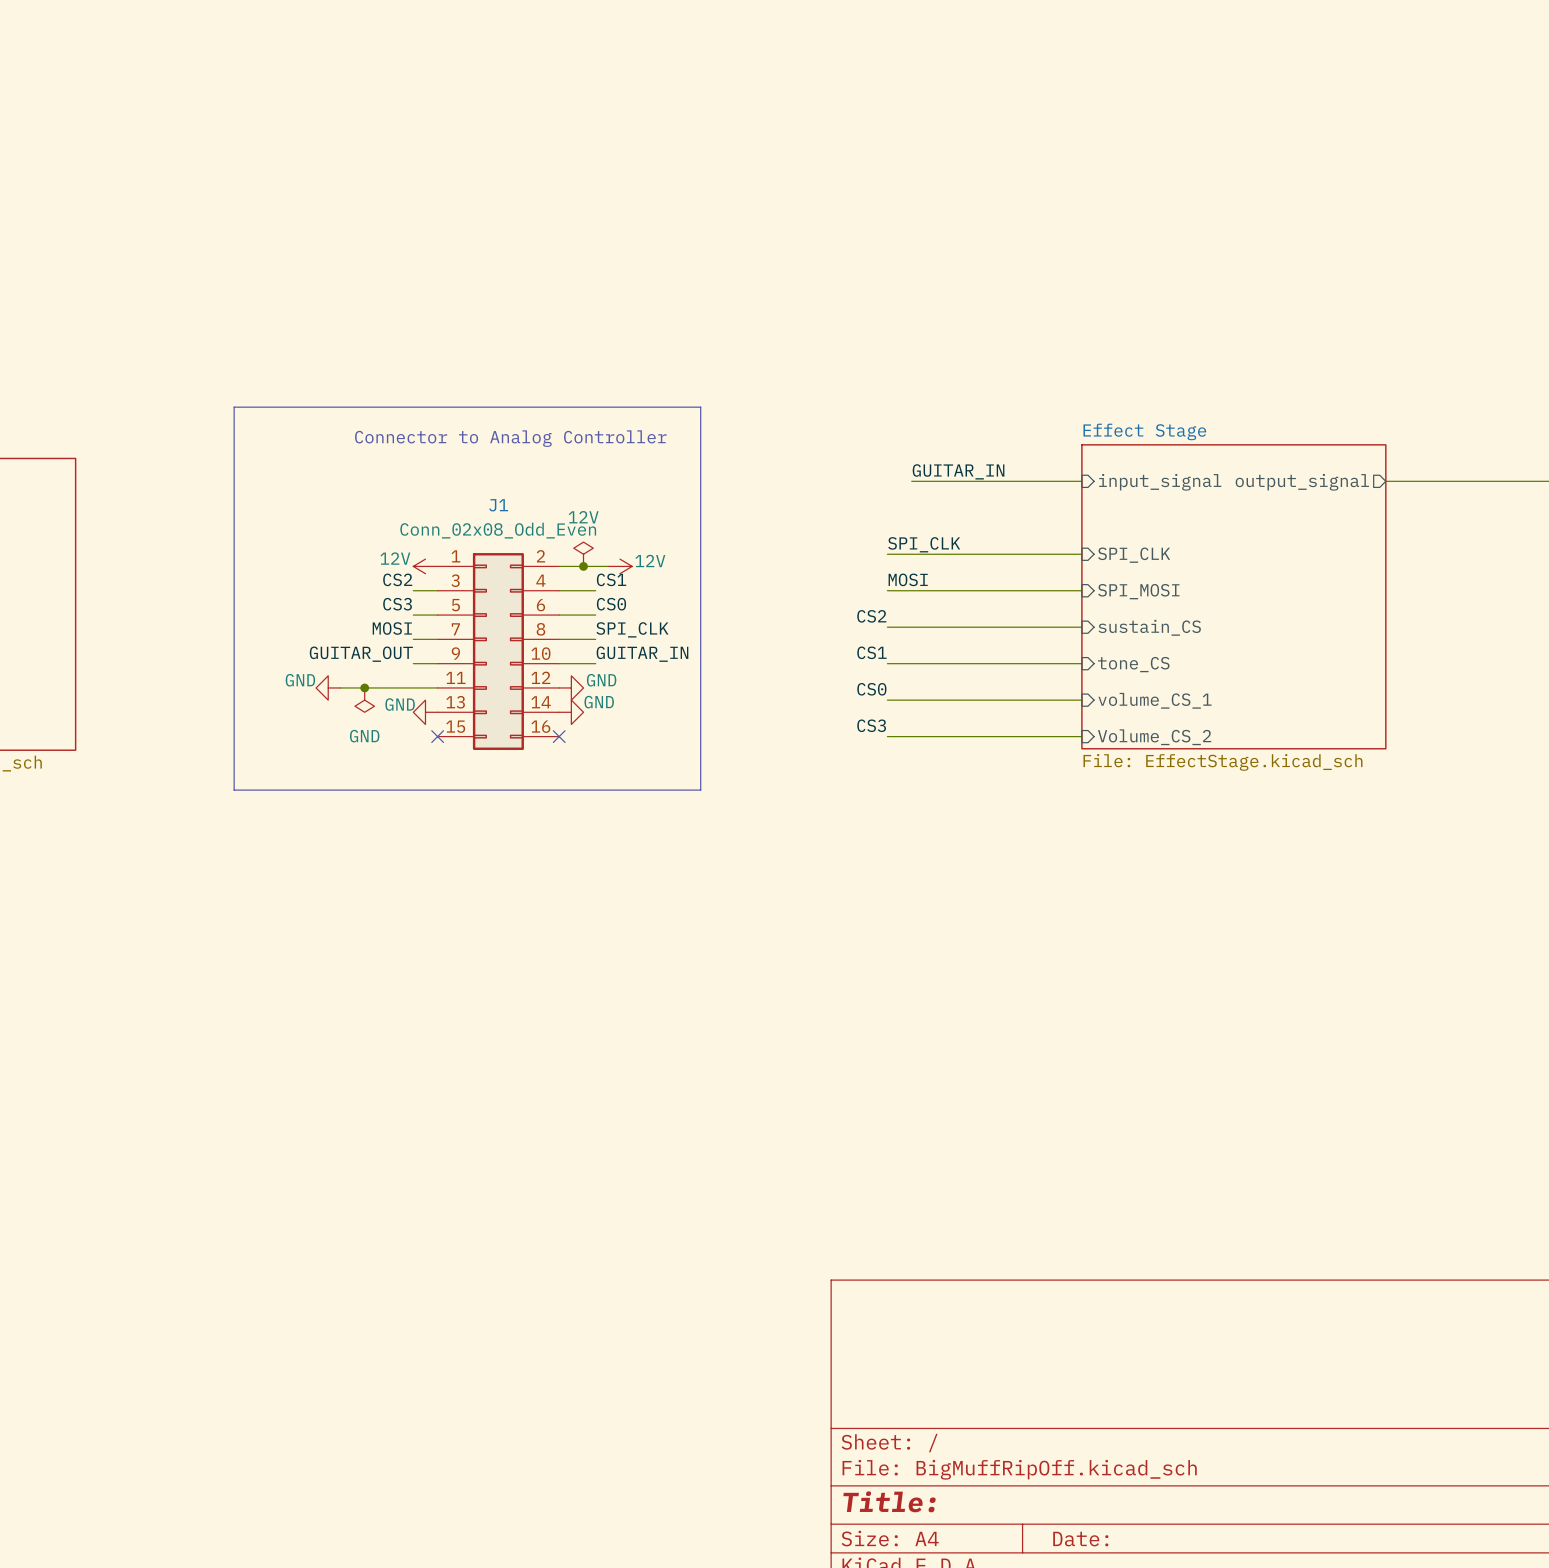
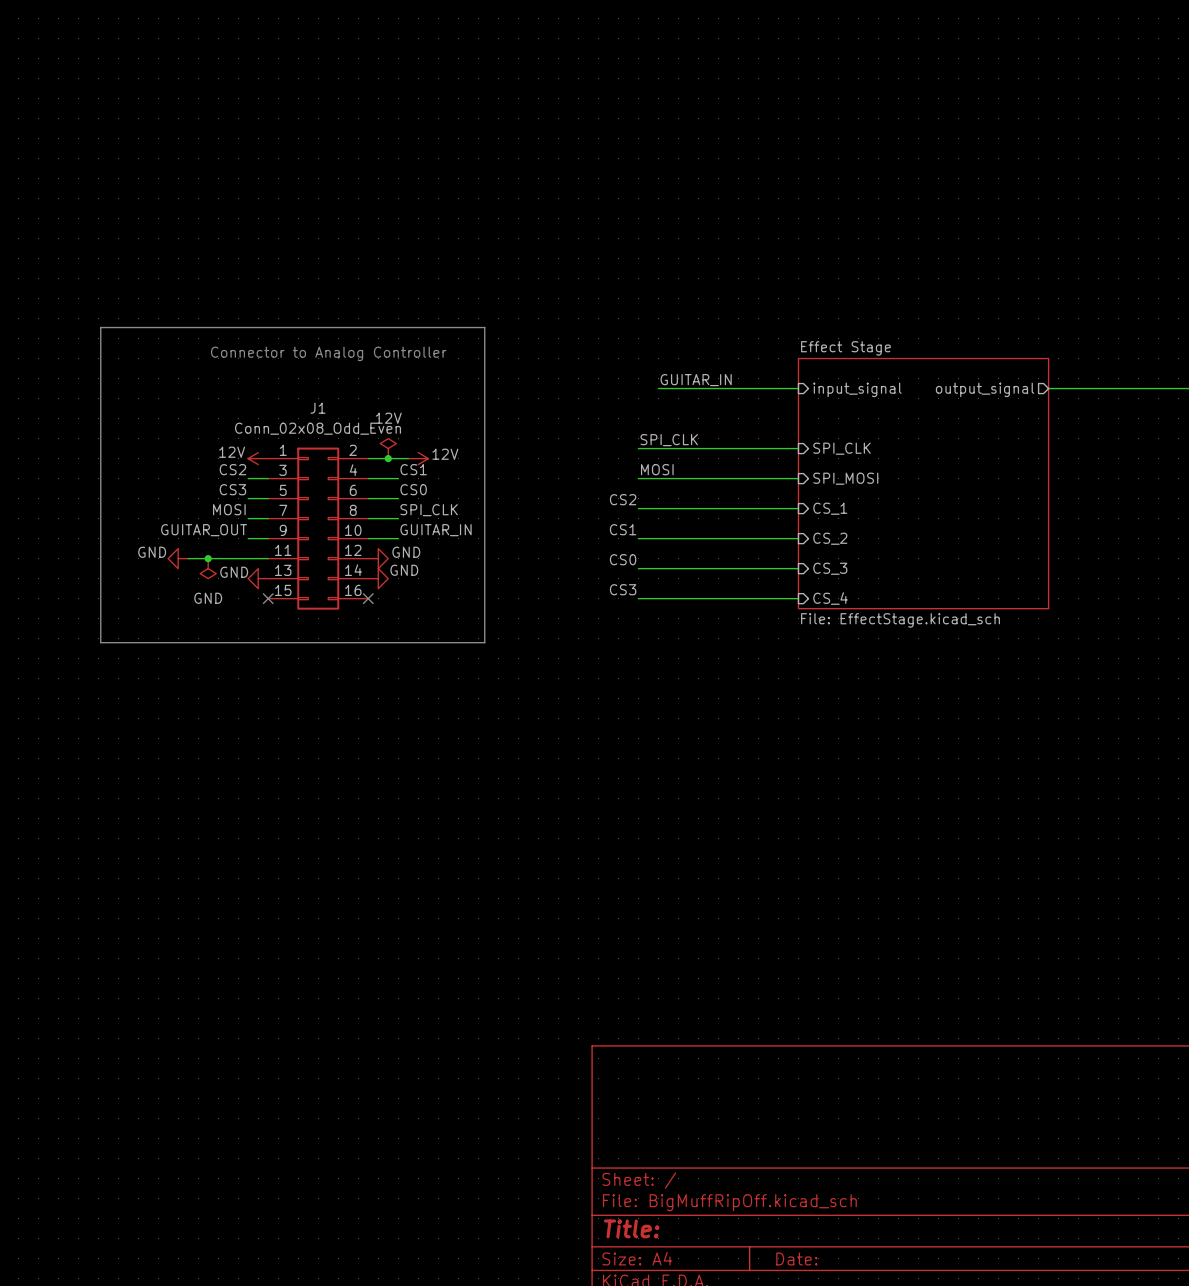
sheet pin: sustain_CS (1149, 627) -> CS_1 (830, 508)
sheet pin: tone_CS (1133, 664) -> CS_2 (830, 538)
sheet pin: volume_CS_1 (1154, 700) -> CS_3 (830, 568)
sheet pin: Volume_CS_2 (1154, 737) -> CS_4 (830, 598)

